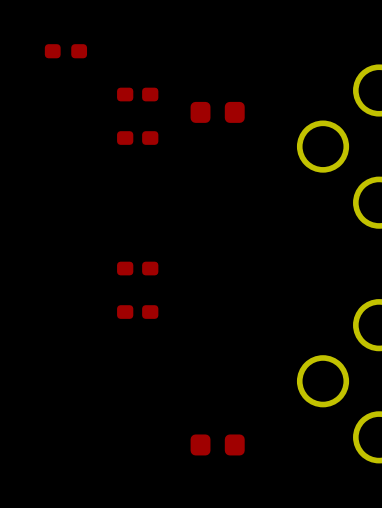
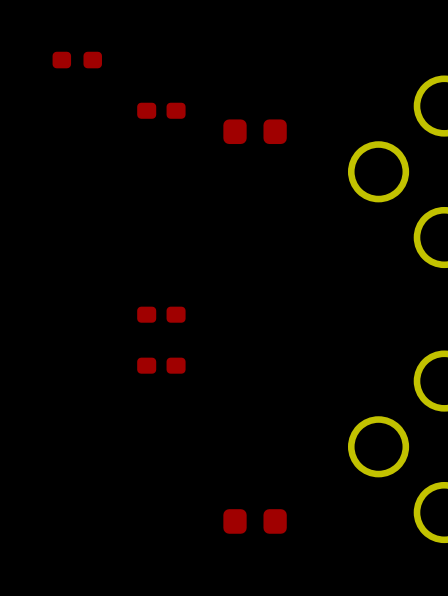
part: (137, 138) -> none

